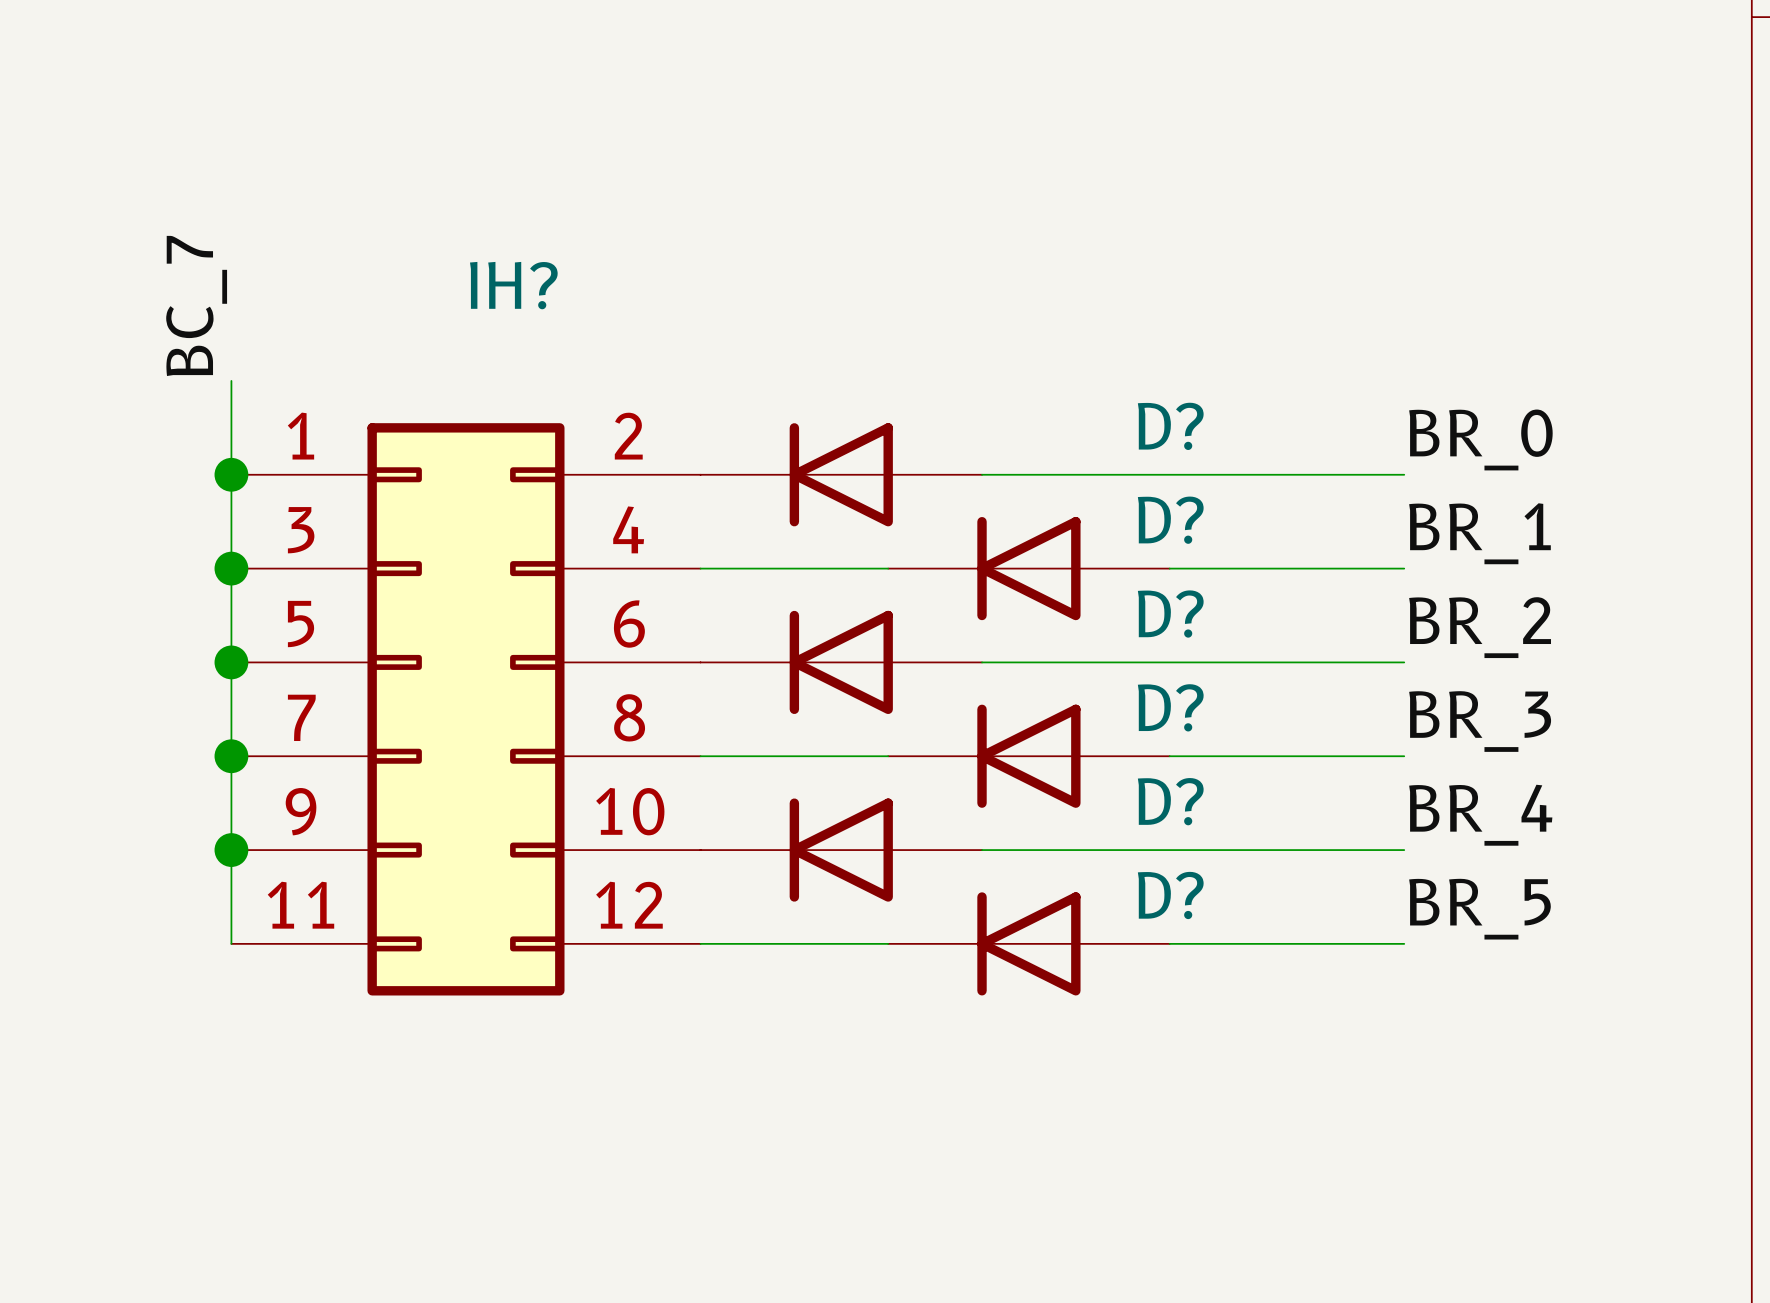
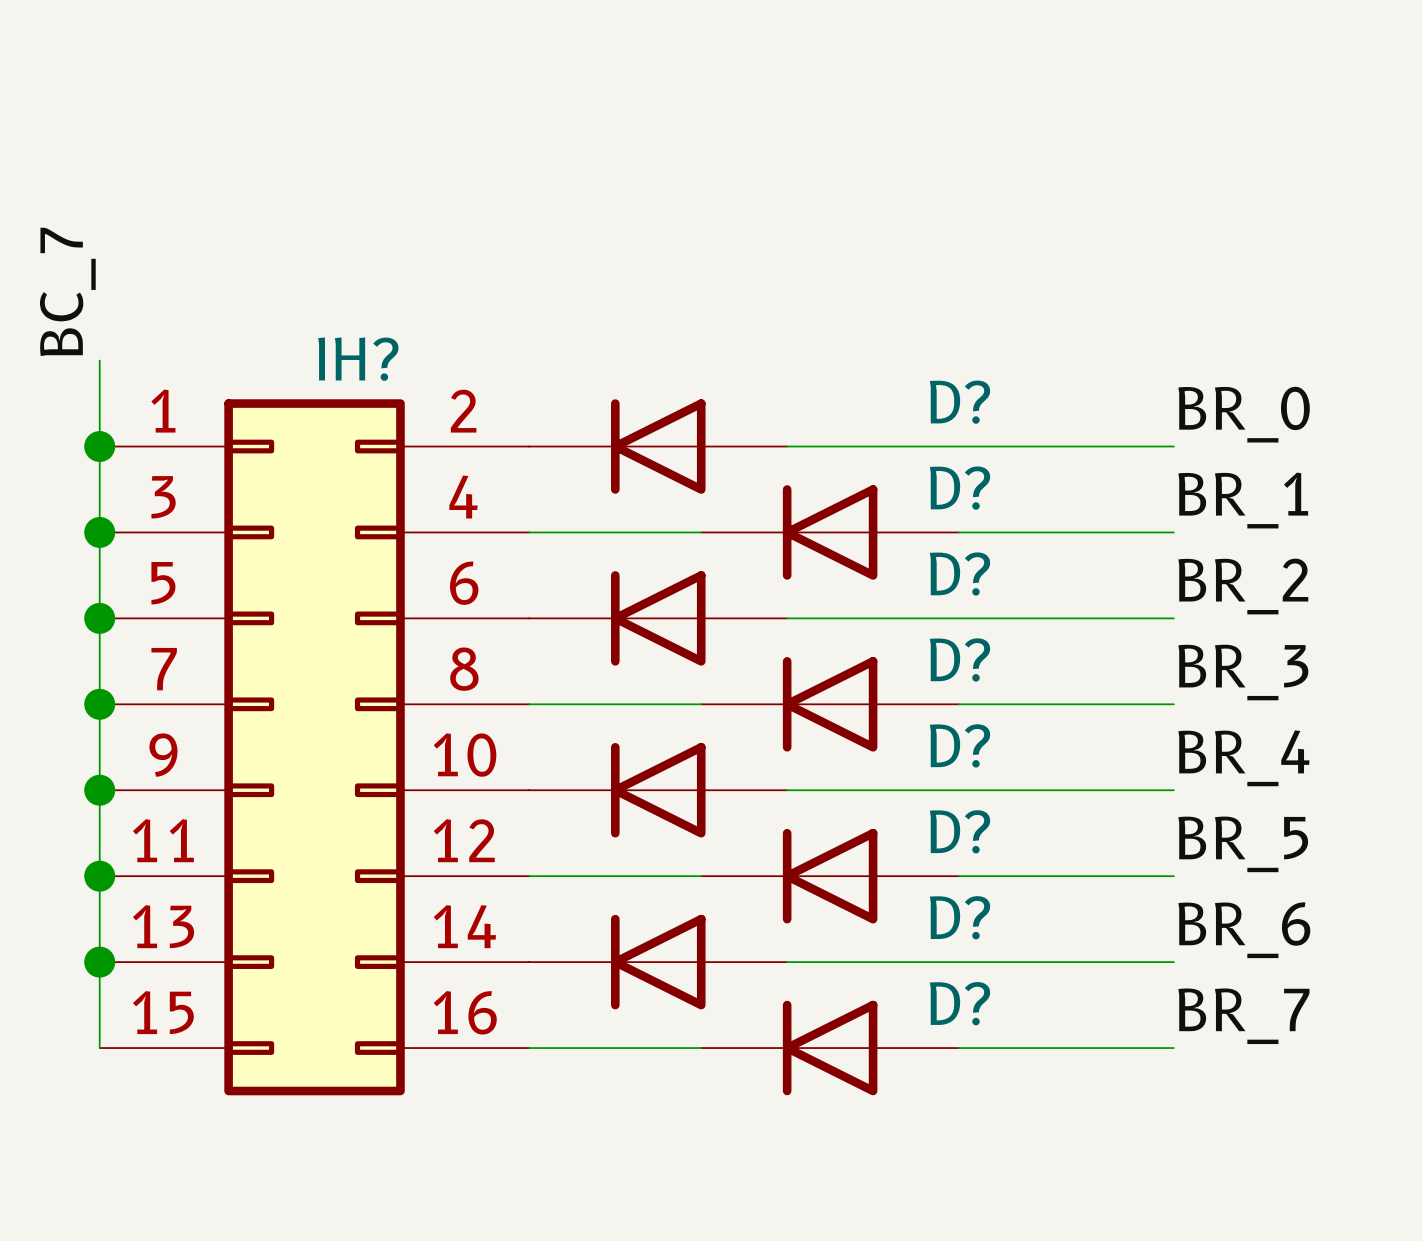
IH?: (465, 709) -> none
IH?: none -> (314, 747)
wire: none -> (99, 876) (99, 1048)
junction: none -> (99, 876)
label: none -> BR_6 (1244, 930)
junction: none -> (99, 962)
D?: none -> (658, 962)
wire: none -> (787, 962) (1173, 962)
label: none -> BR_7 (1243, 1016)
wire: none -> (529, 1048) (701, 1048)
D?: none -> (830, 1048)
wire: none -> (959, 1048) (1173, 1048)

